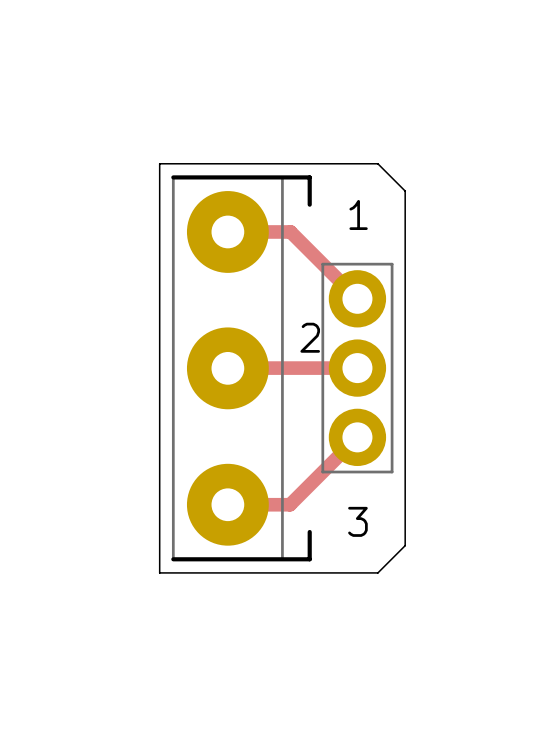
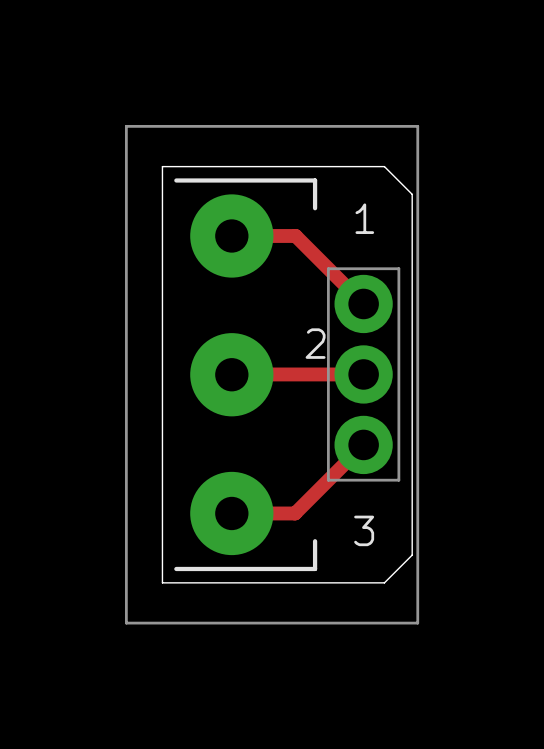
part footprint: [171, 175, 312, 562] -> [124, 124, 420, 625]

